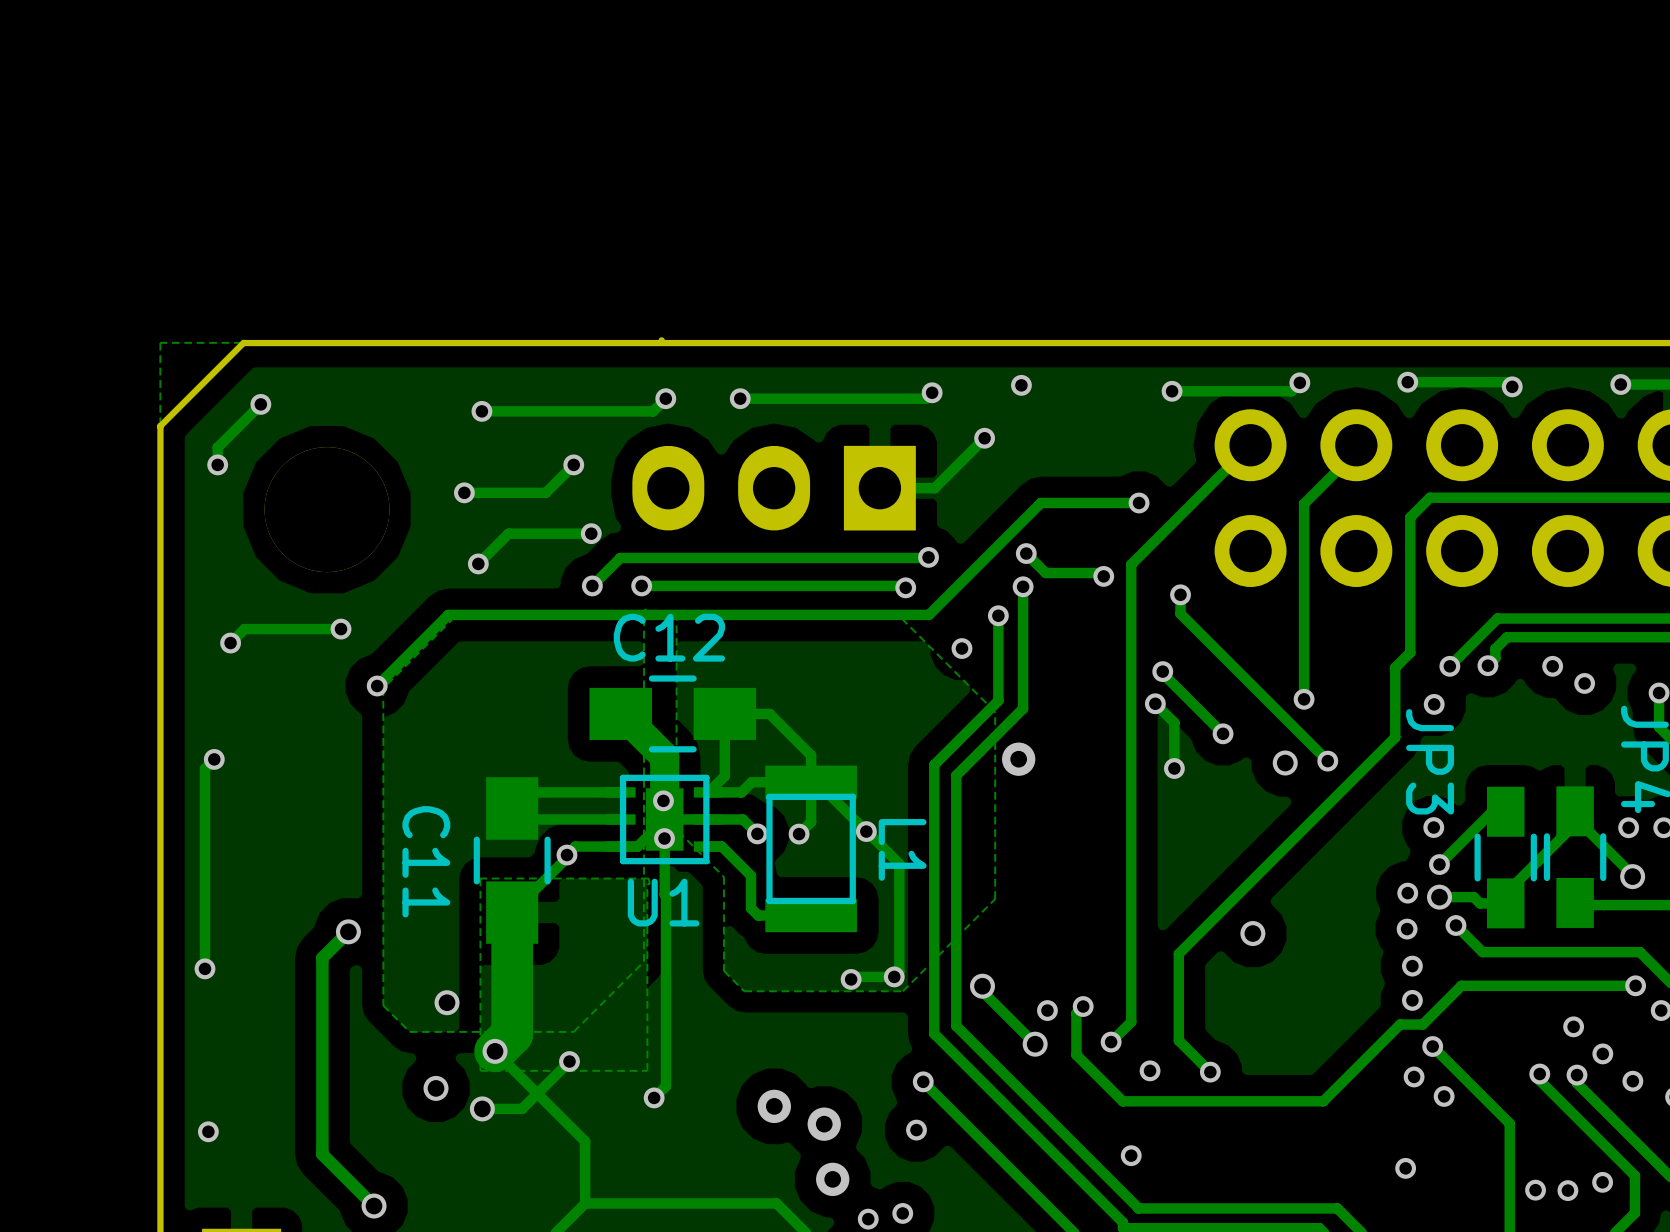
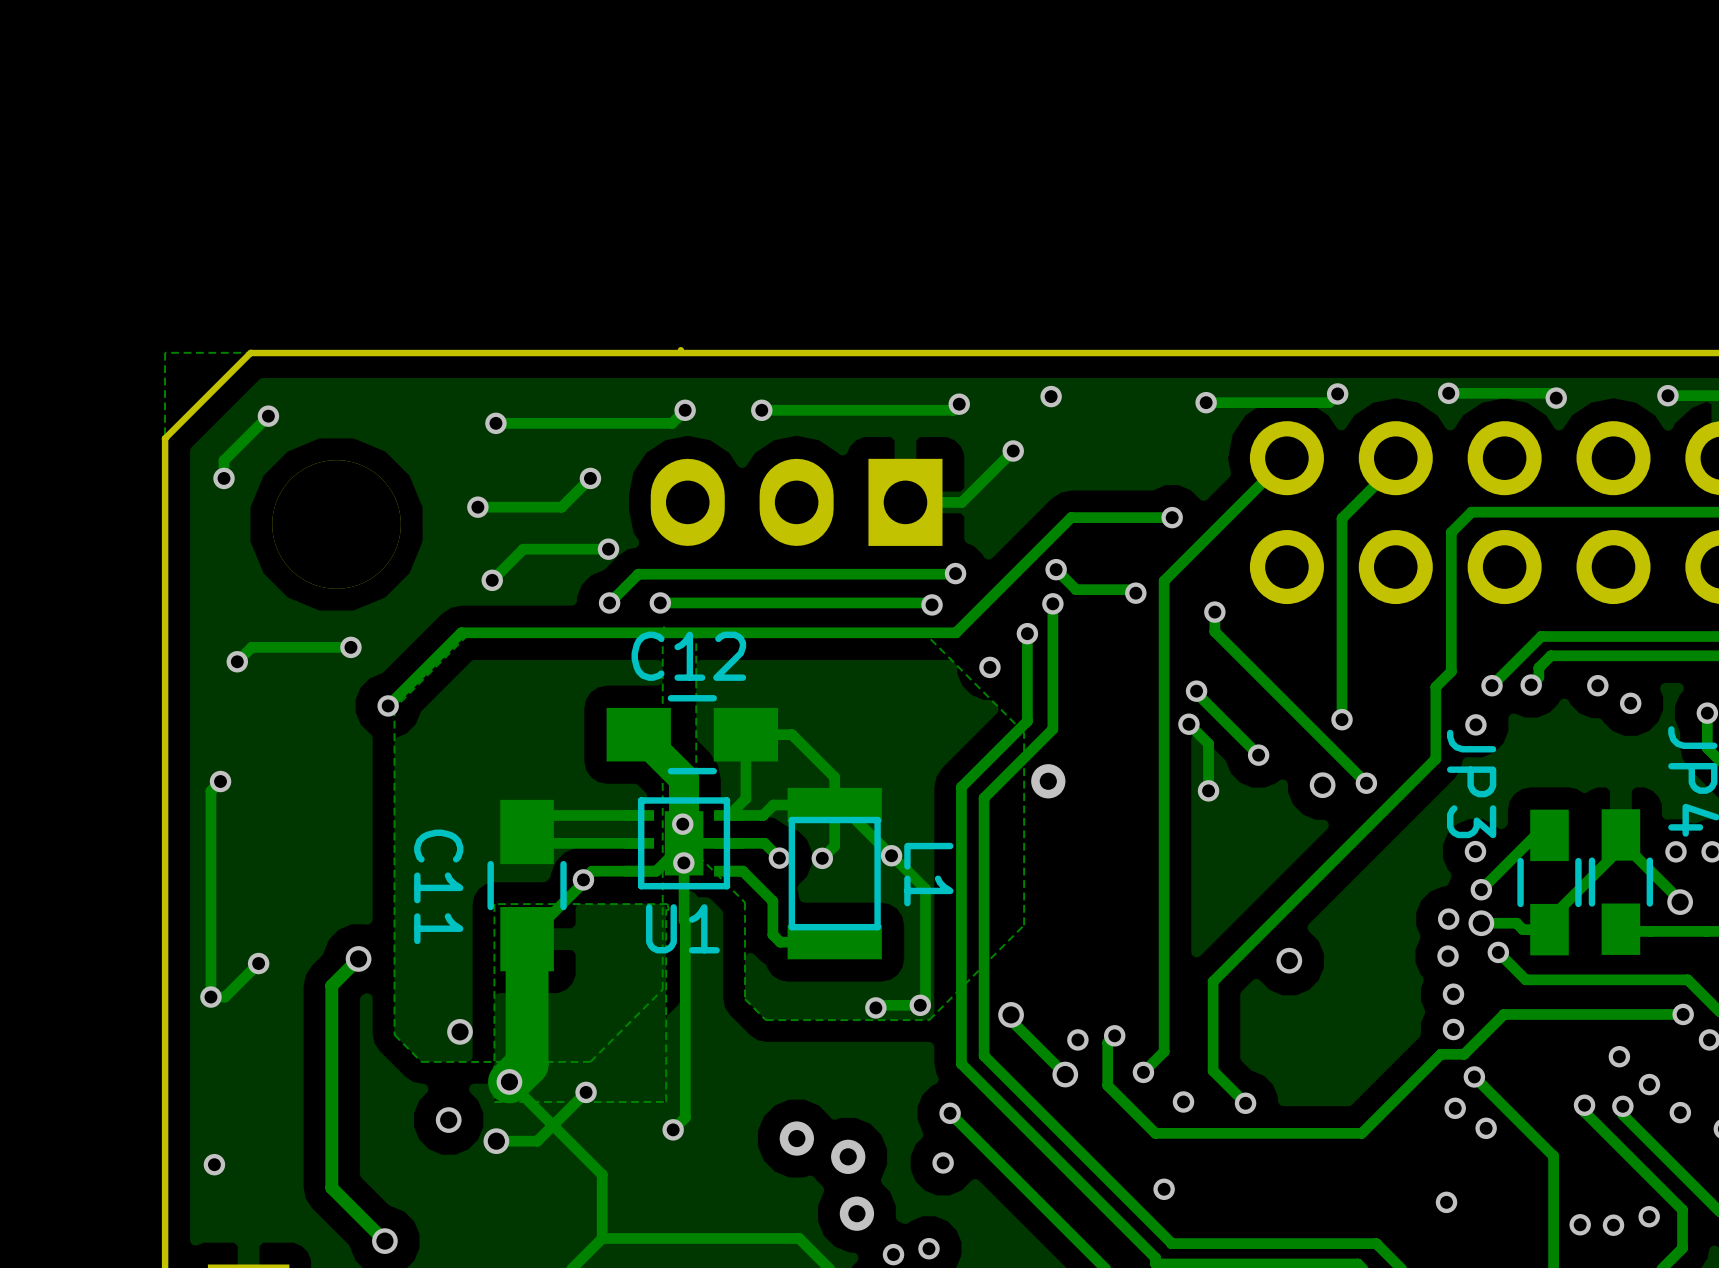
track: none -> (258, 963) (225, 997) (210, 997)
via: none -> (258, 963)

